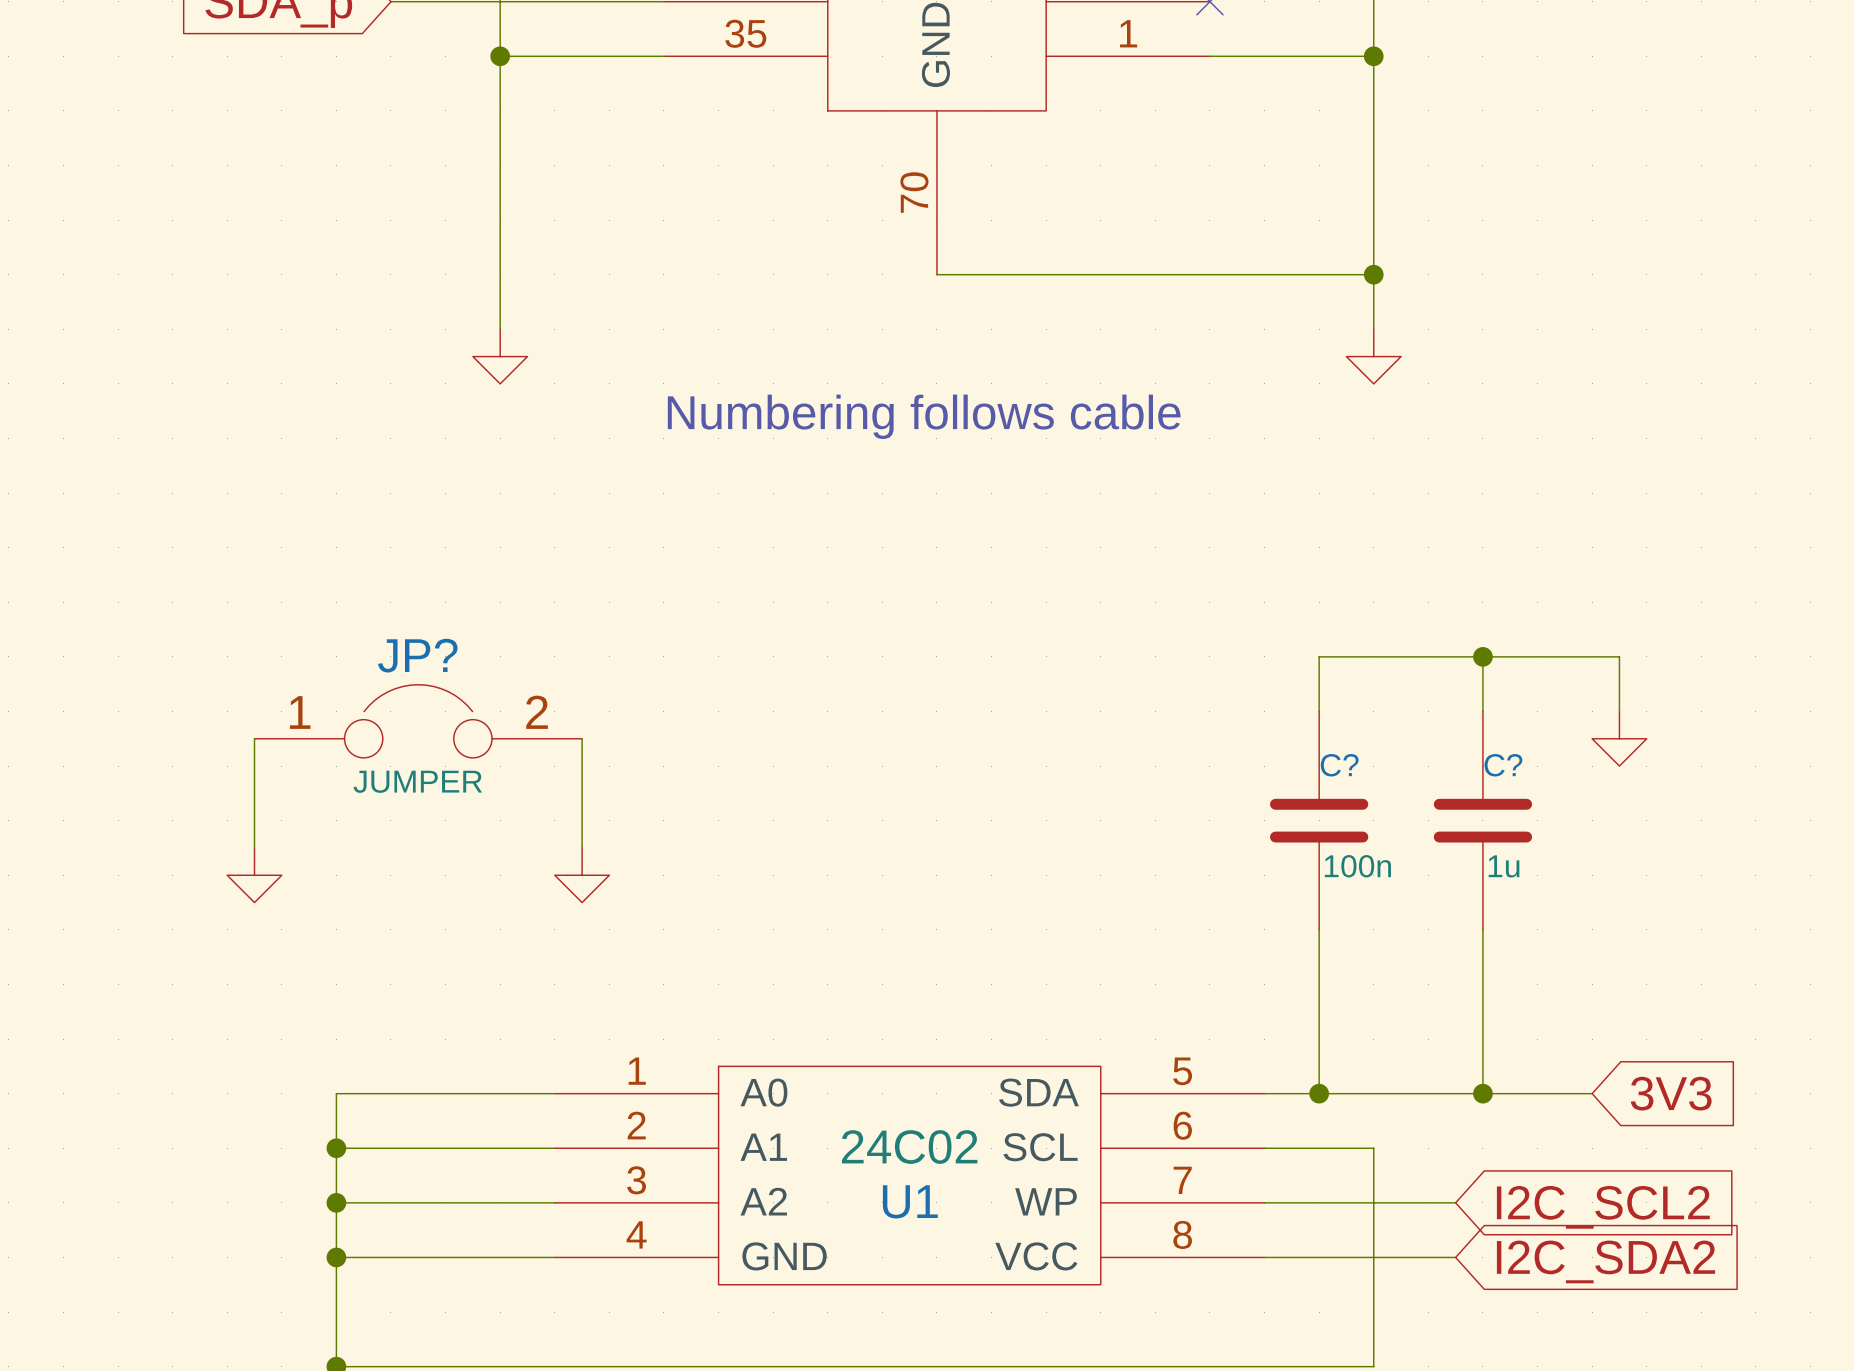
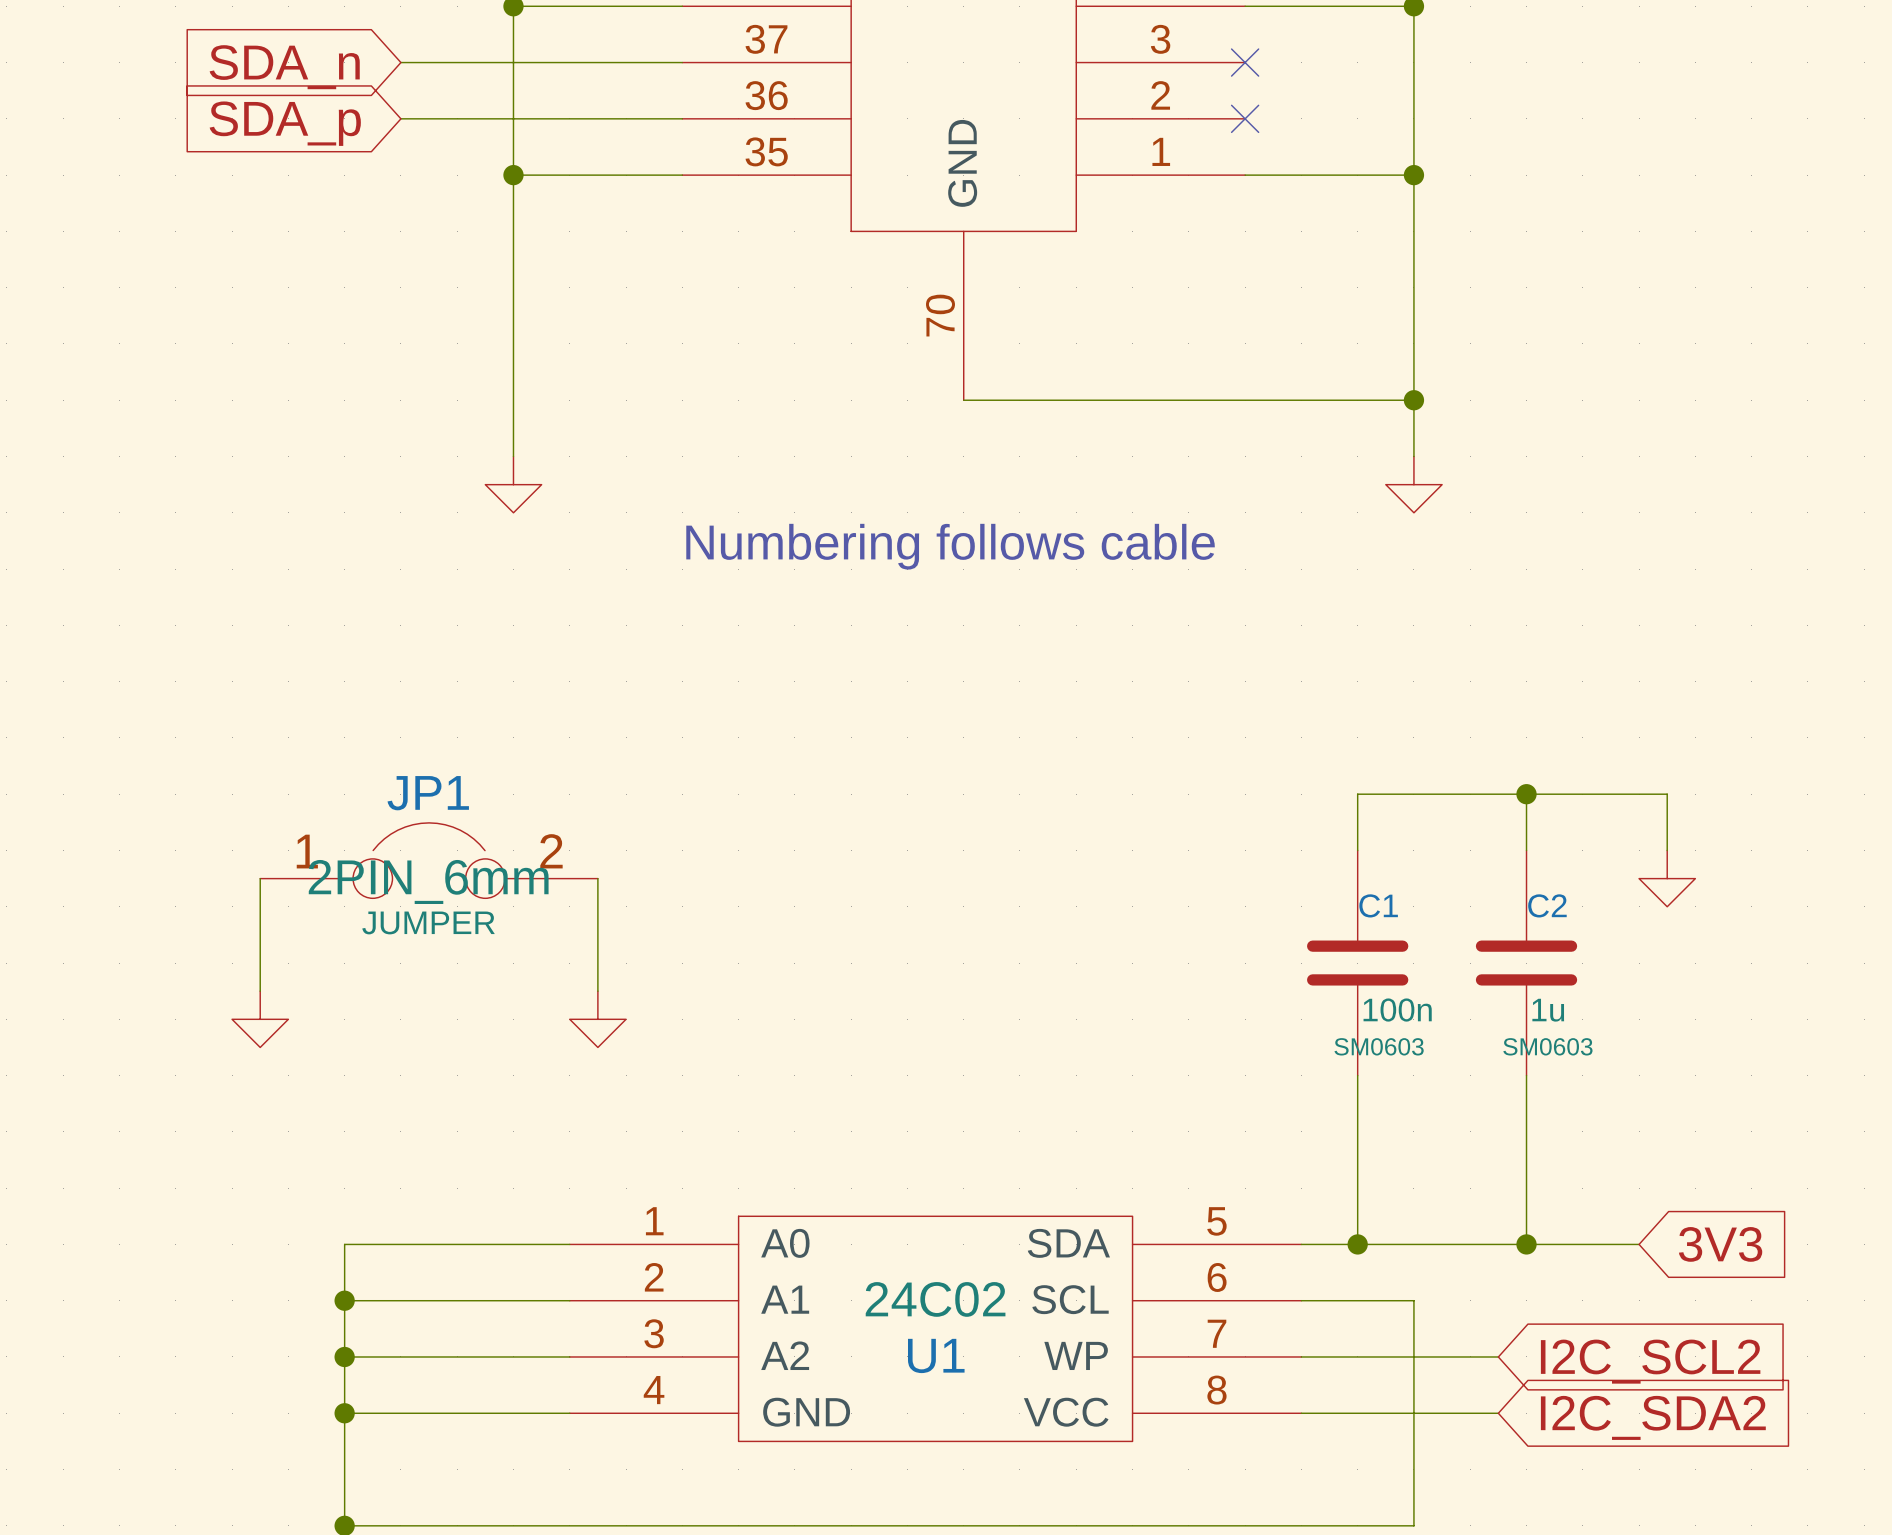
JP? name: JP? (417, 655) -> JP1 (428, 793)
JP? text: none -> 2PIN_6mm (428, 881)
C? name: C? (1339, 765) -> C1 (1378, 905)
C? name: C? (1503, 765) -> C2 (1547, 905)
C? text: none -> SM0603 (1379, 1046)
C? text: none -> SM0603 (1547, 1046)

